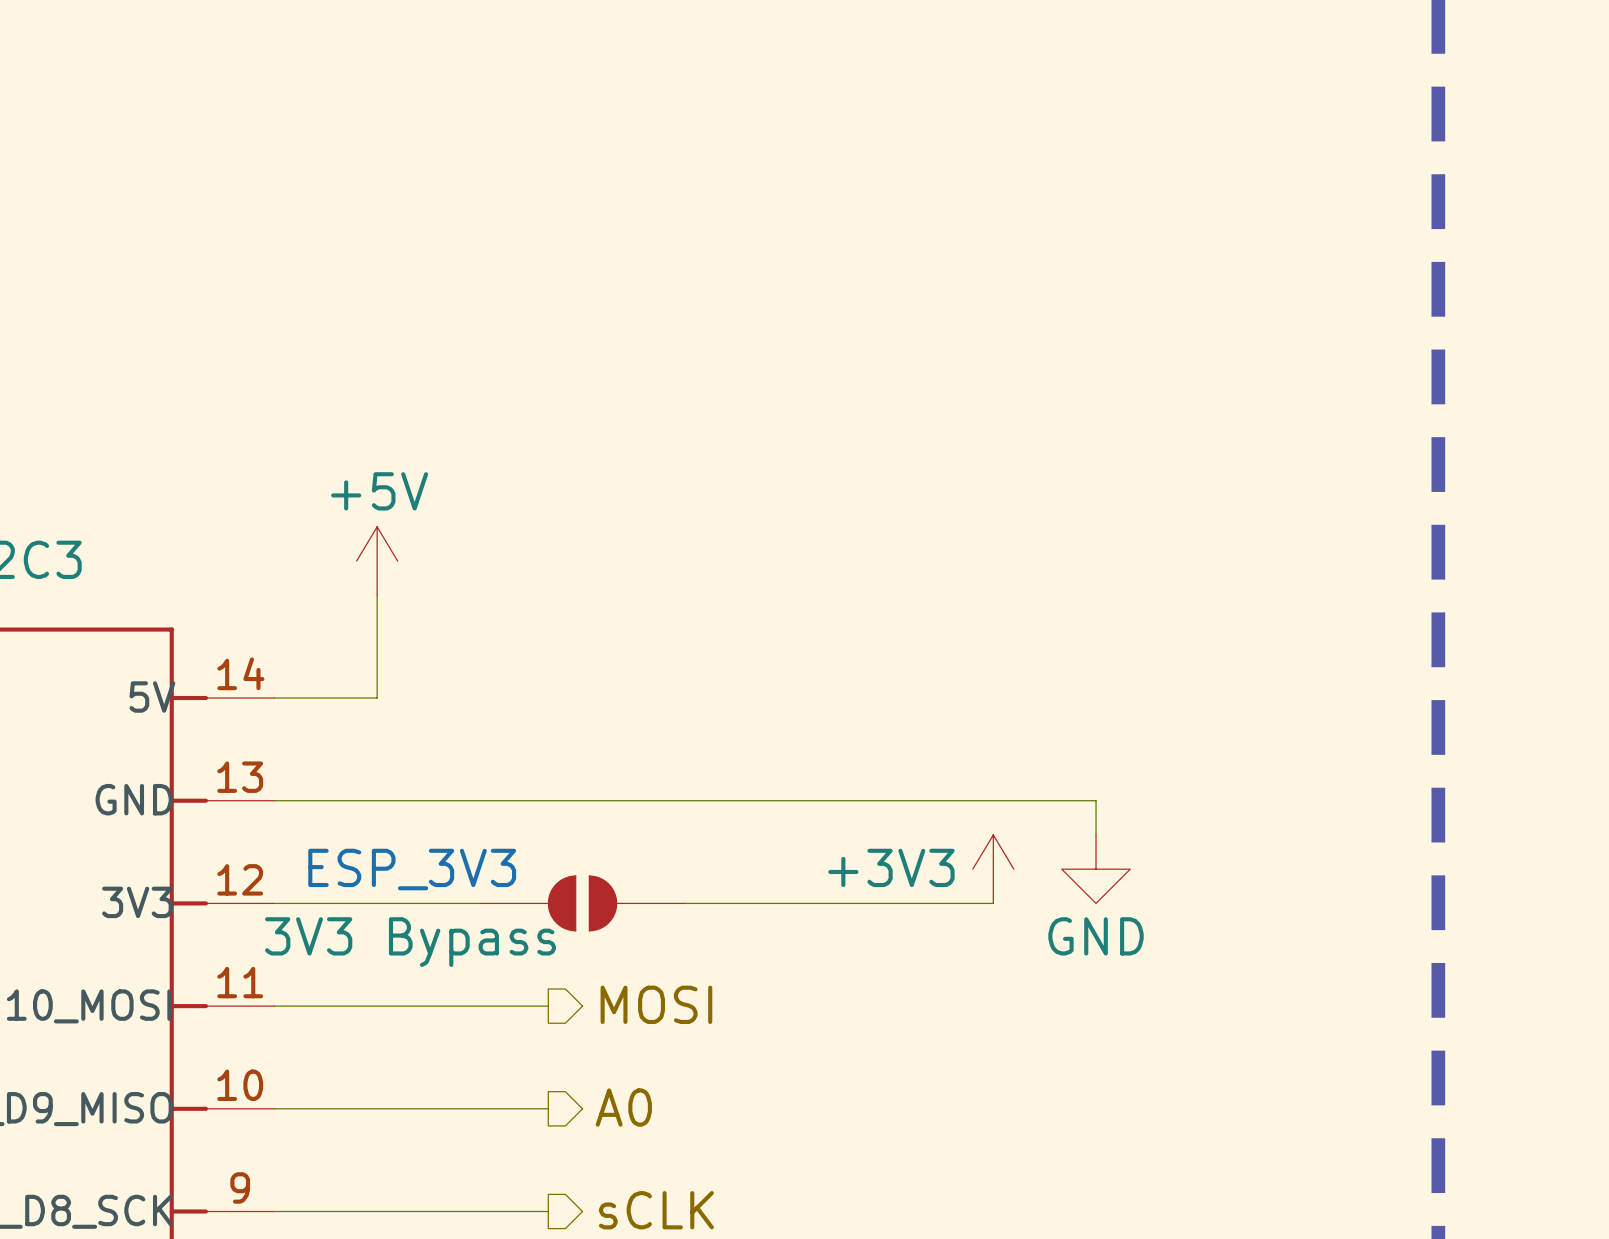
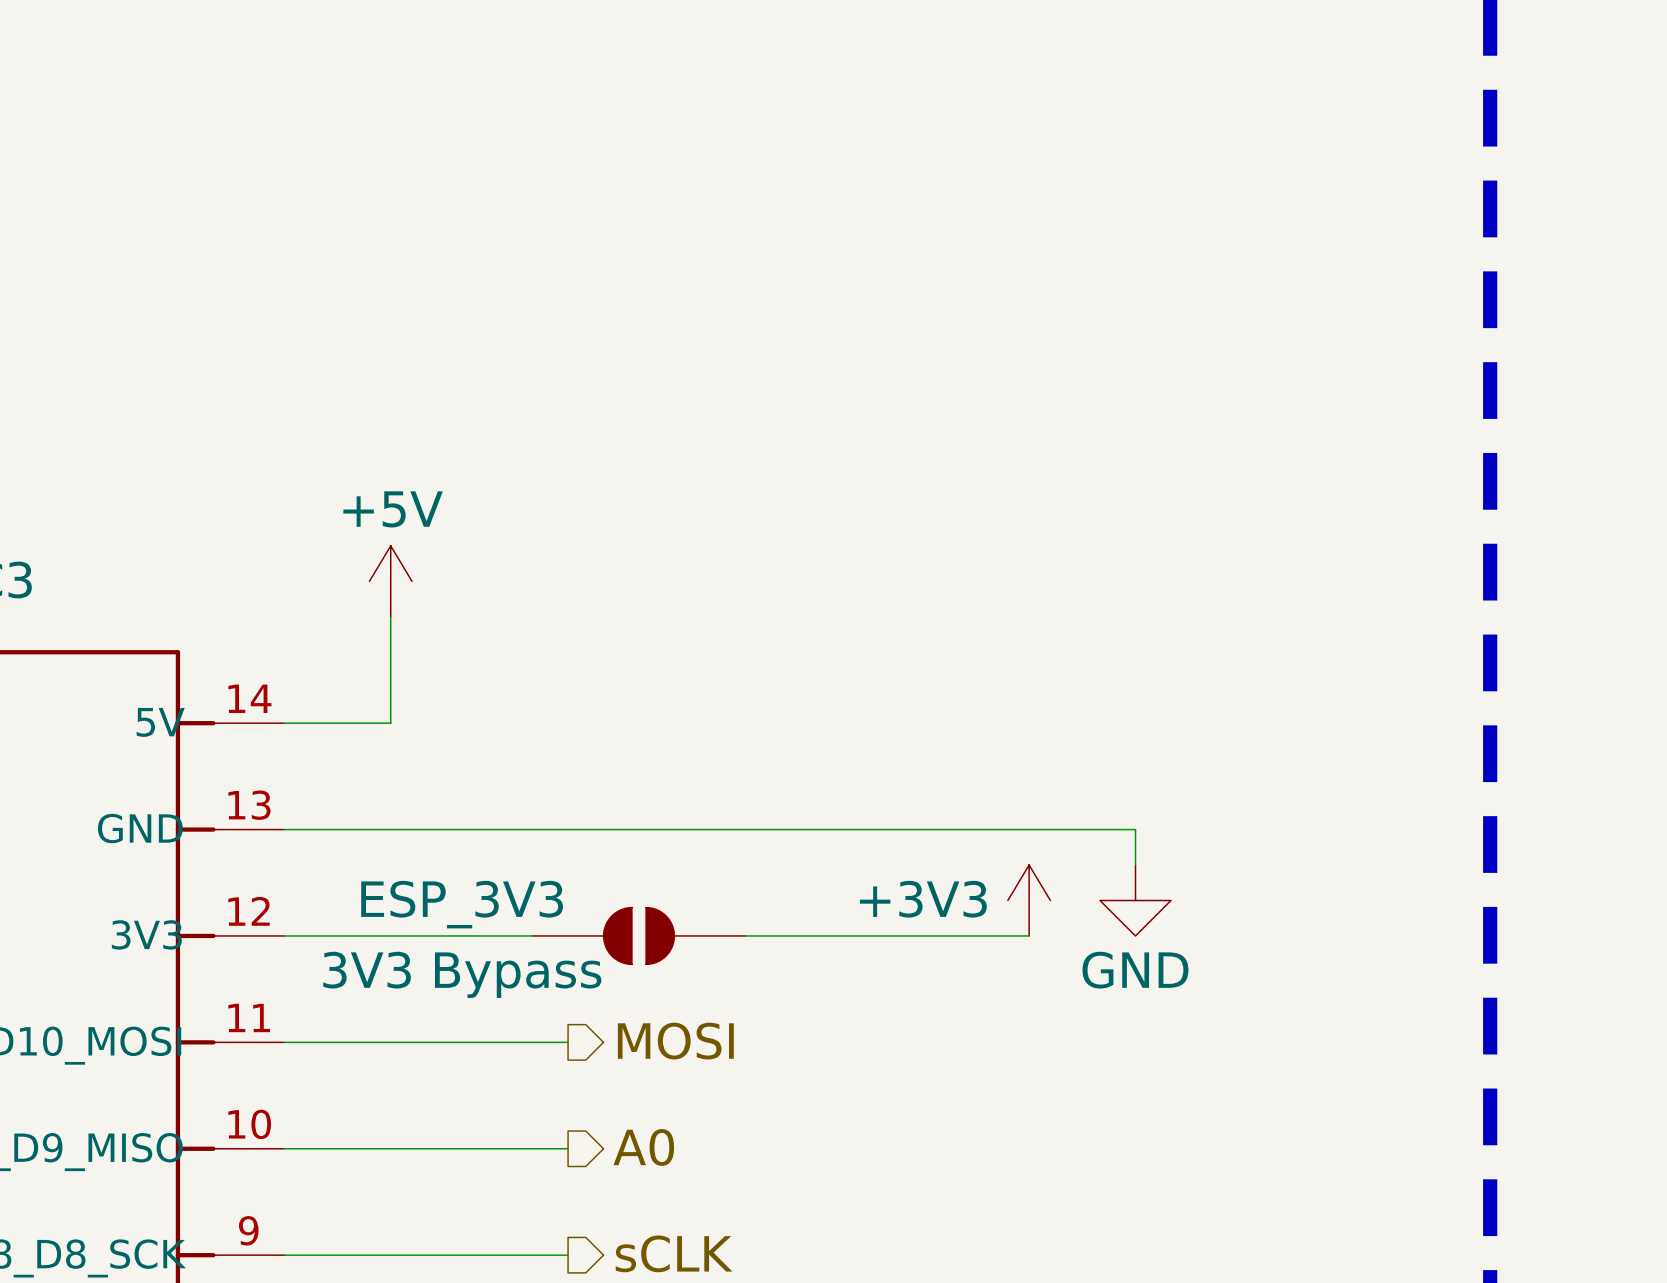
ESP_3V3 position: (582, 903) -> (638, 935)

